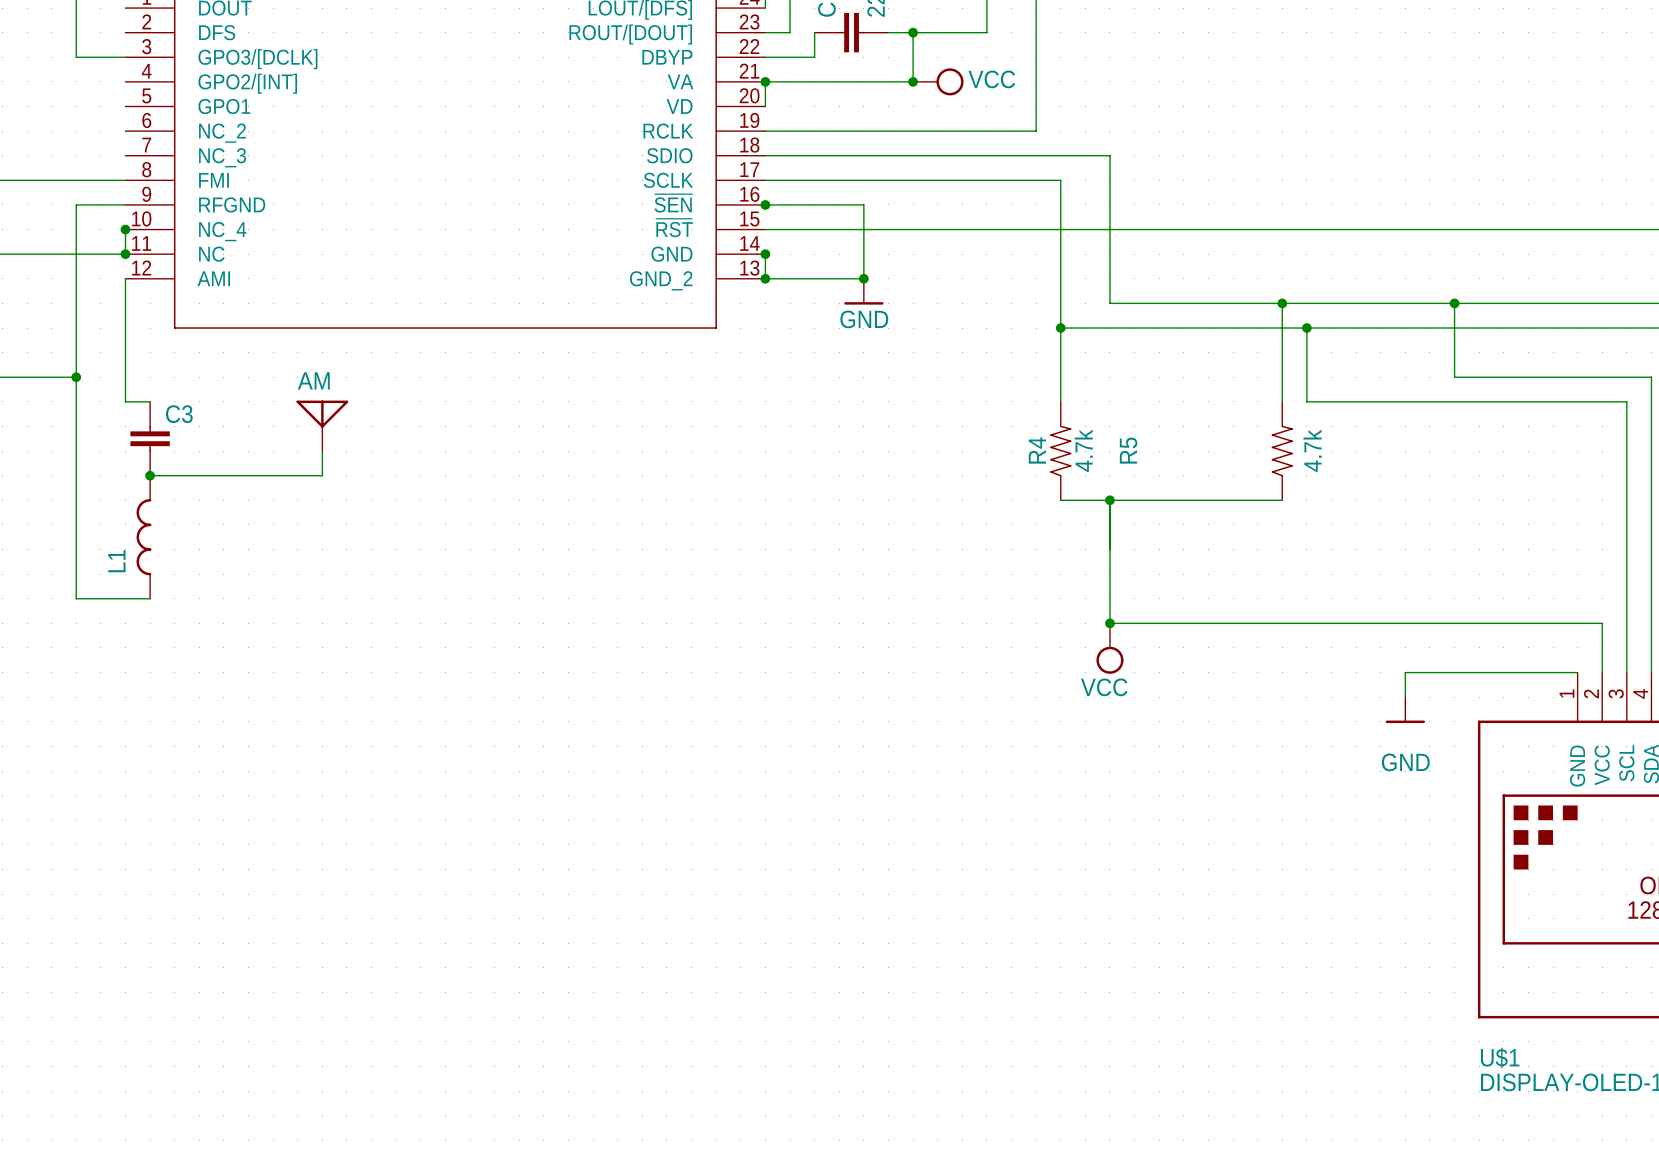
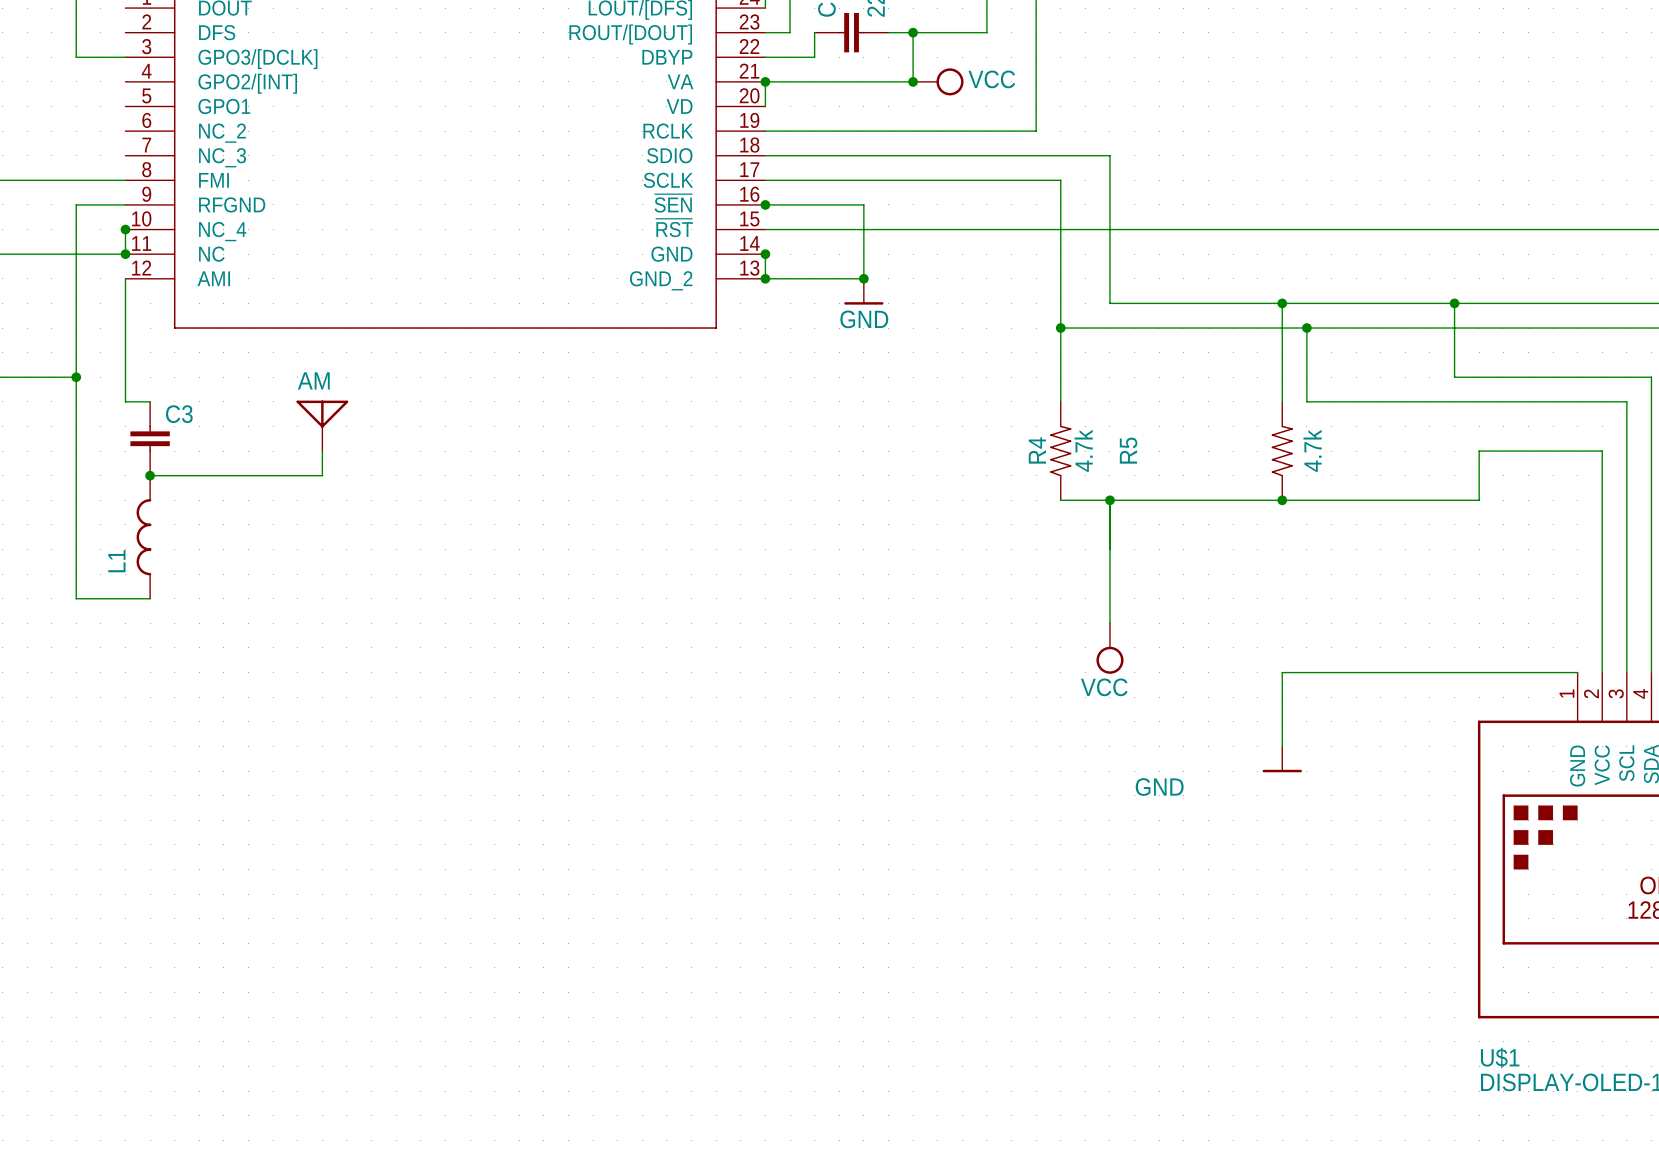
junction: none -> (1282, 500)
wire: (1109, 623) (1602, 623) -> (1282, 500) (1479, 500) (1479, 451) (1602, 451) (1602, 623)
junction: (1109, 623) -> none
wire: (1405, 672) (1405, 697) -> (1405, 672) (1282, 672) (1282, 746)
power symbol position: GND (1405, 710) -> GND (1282, 759)
power symbol text position: GND (1405, 762) -> GND (1159, 787)

